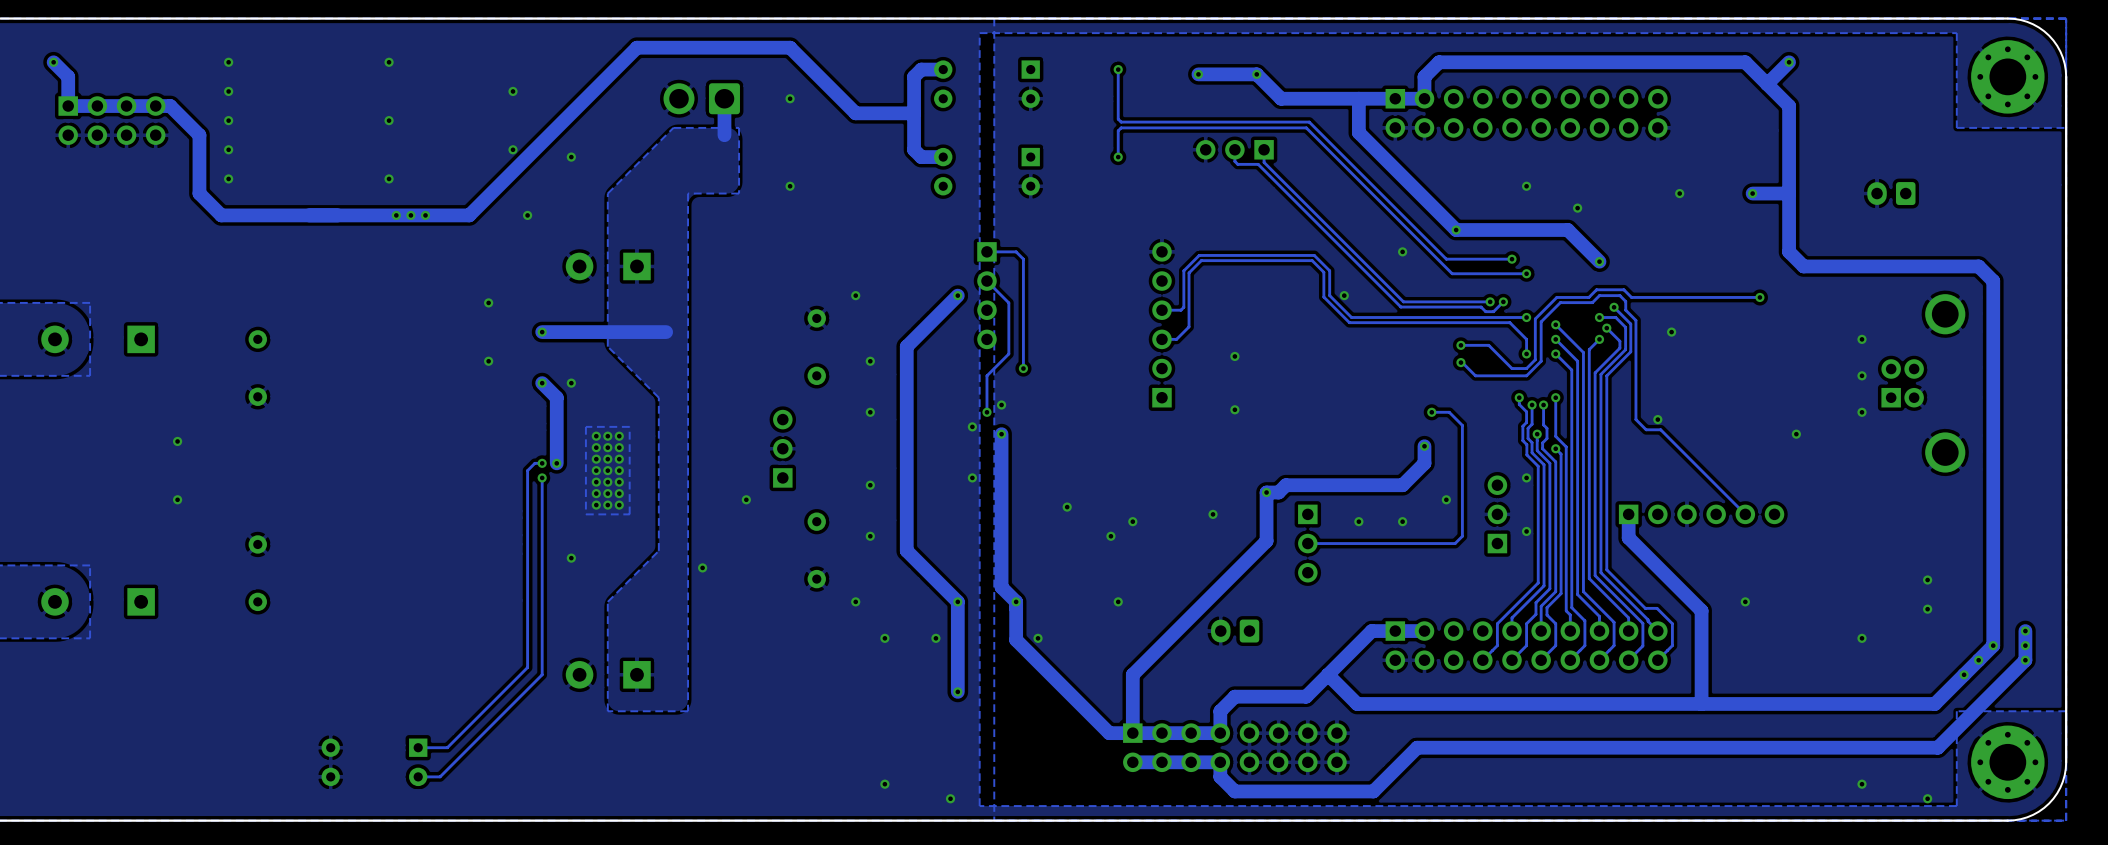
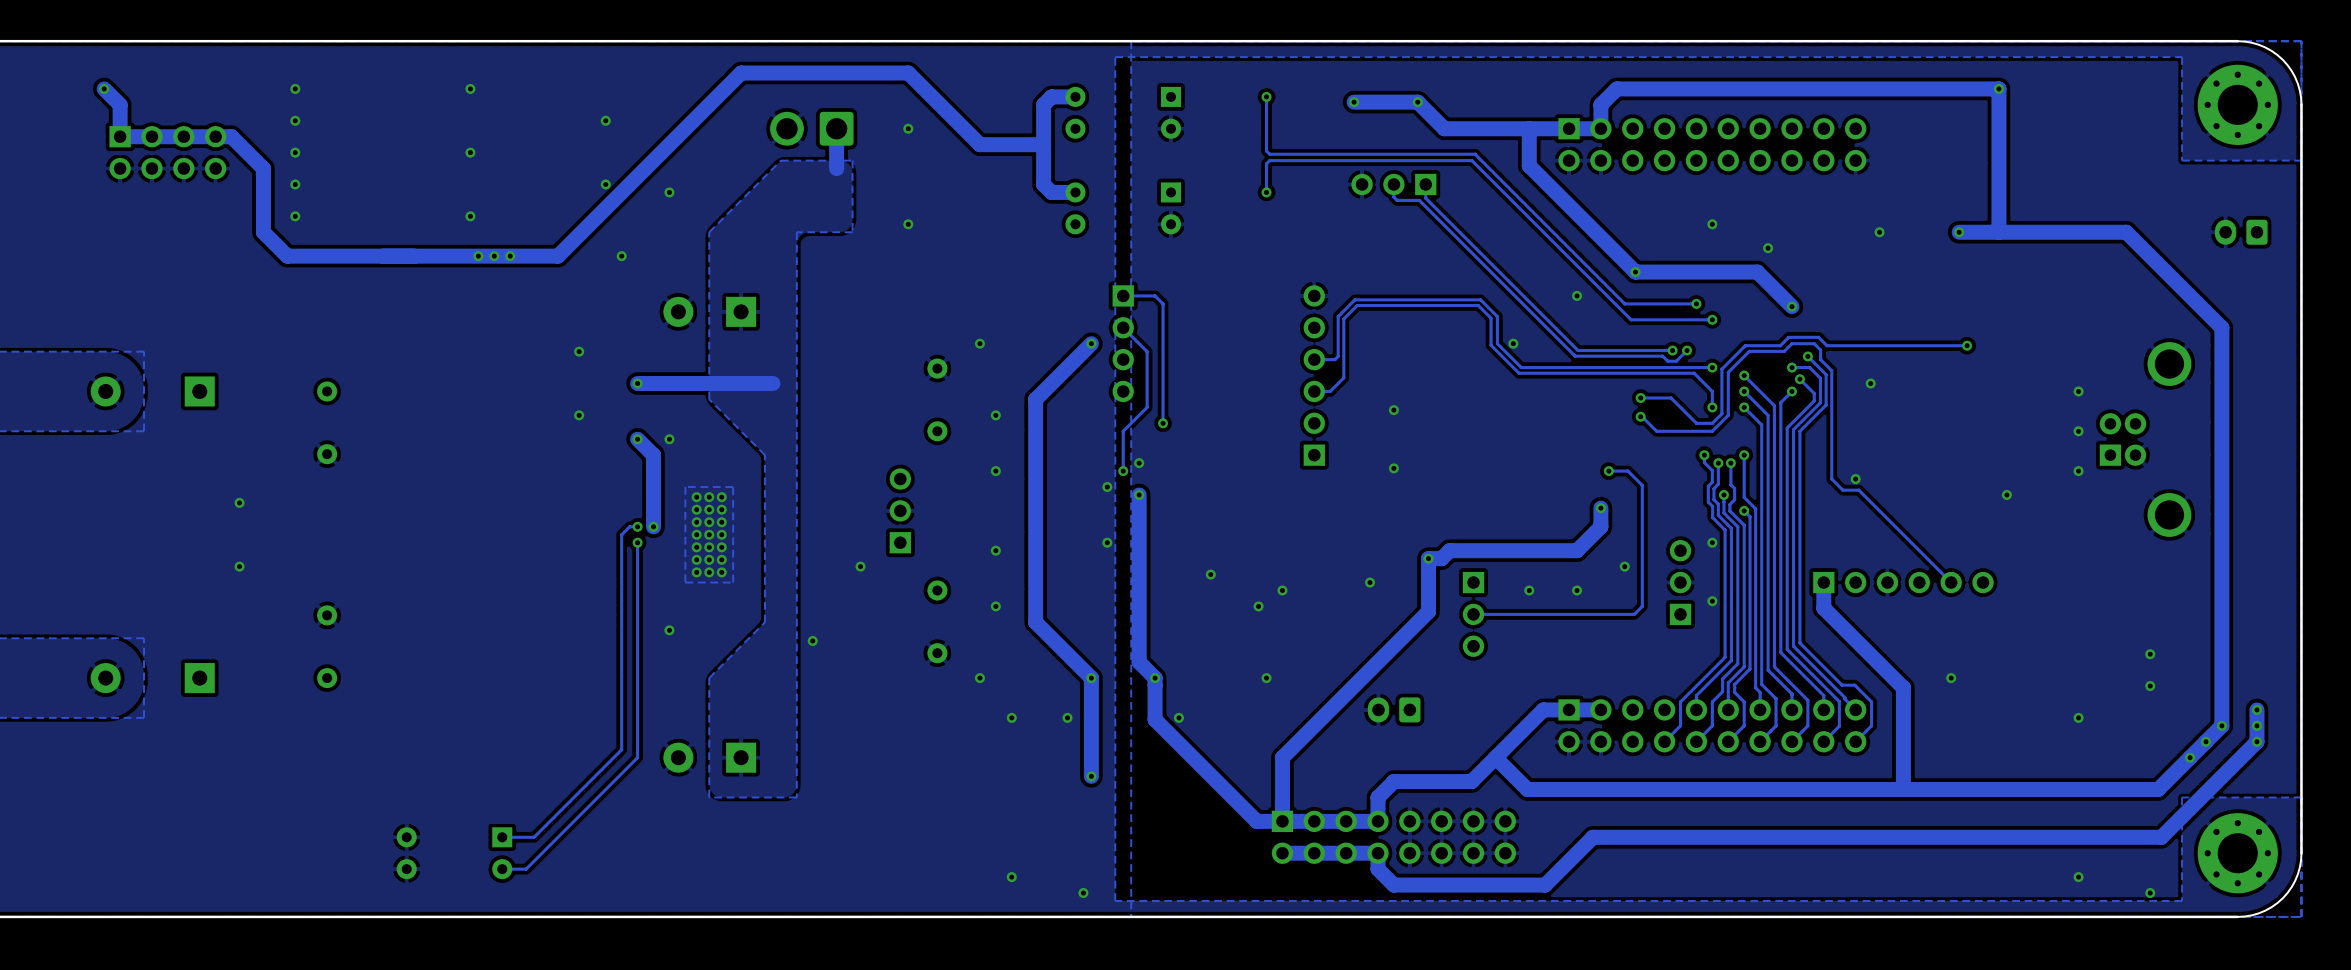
track: (1745, 62) (1789, 106) -> (1951, 88) (1998, 88) (1998, 136)
track: (1789, 62) (1767, 84) -> none
track: (1789, 193) (1789, 251) (1803, 266) (1978, 266) -> (1998, 232) (2126, 232) (2205, 311)
part position: (1891, 193) -> (2241, 232)

